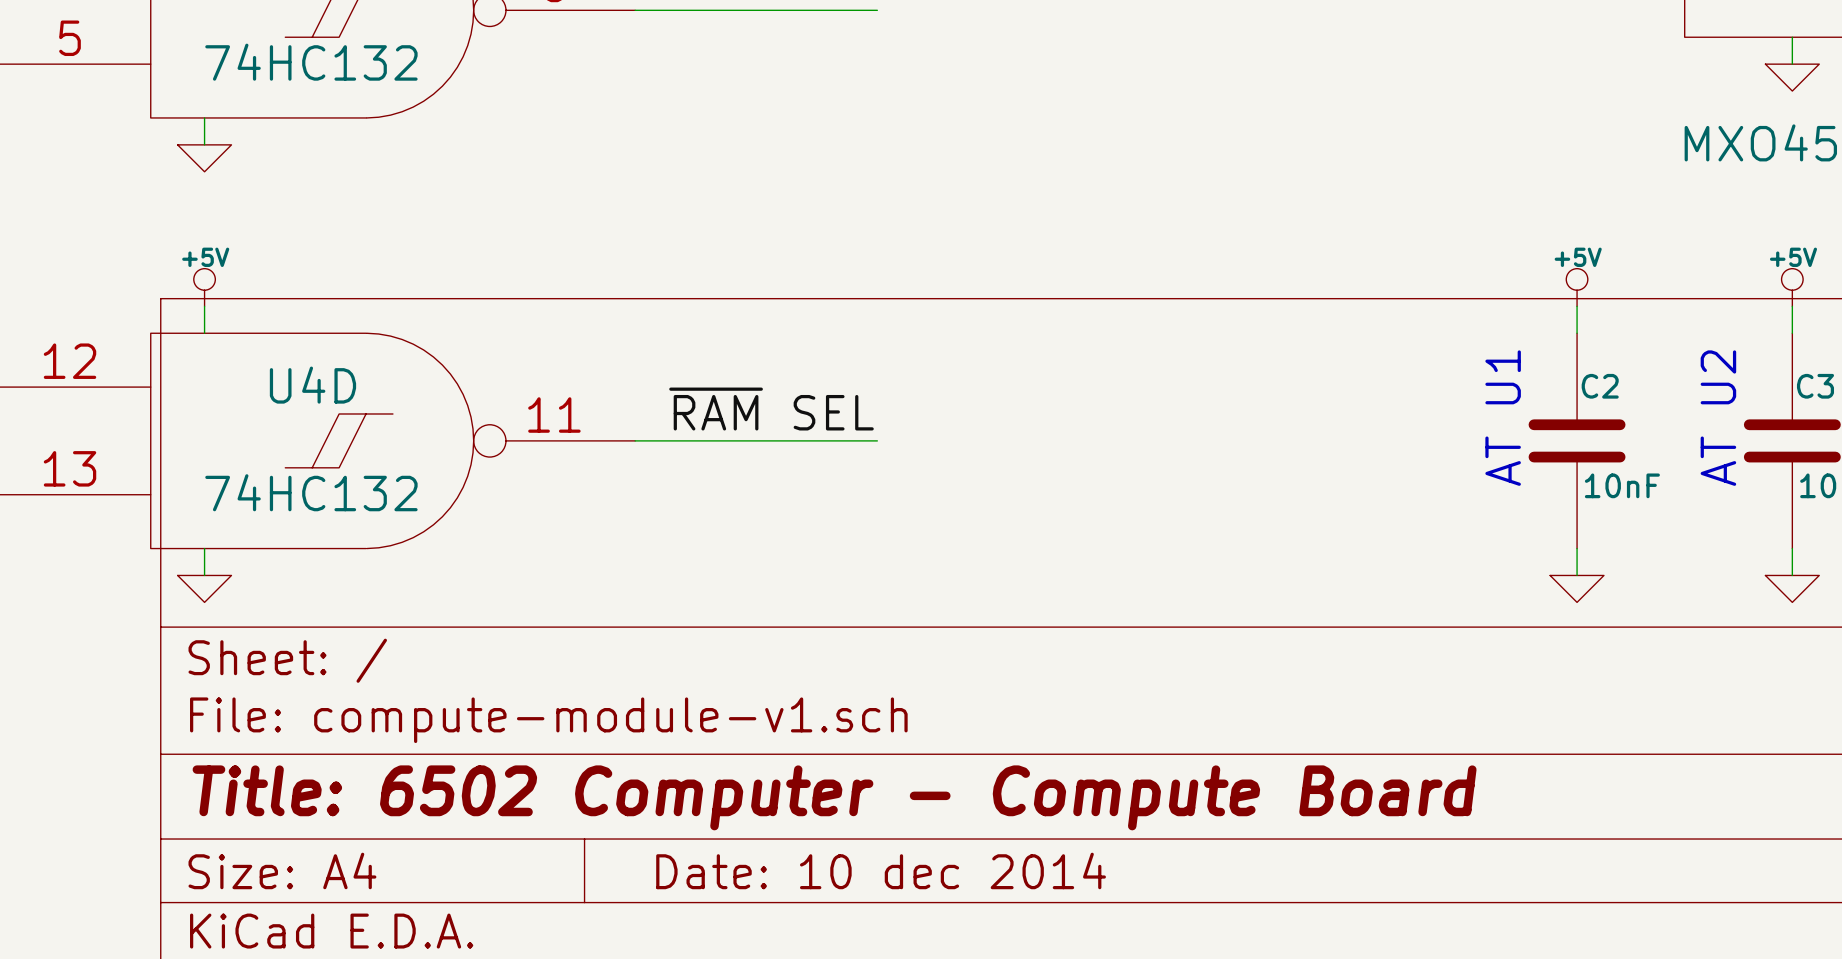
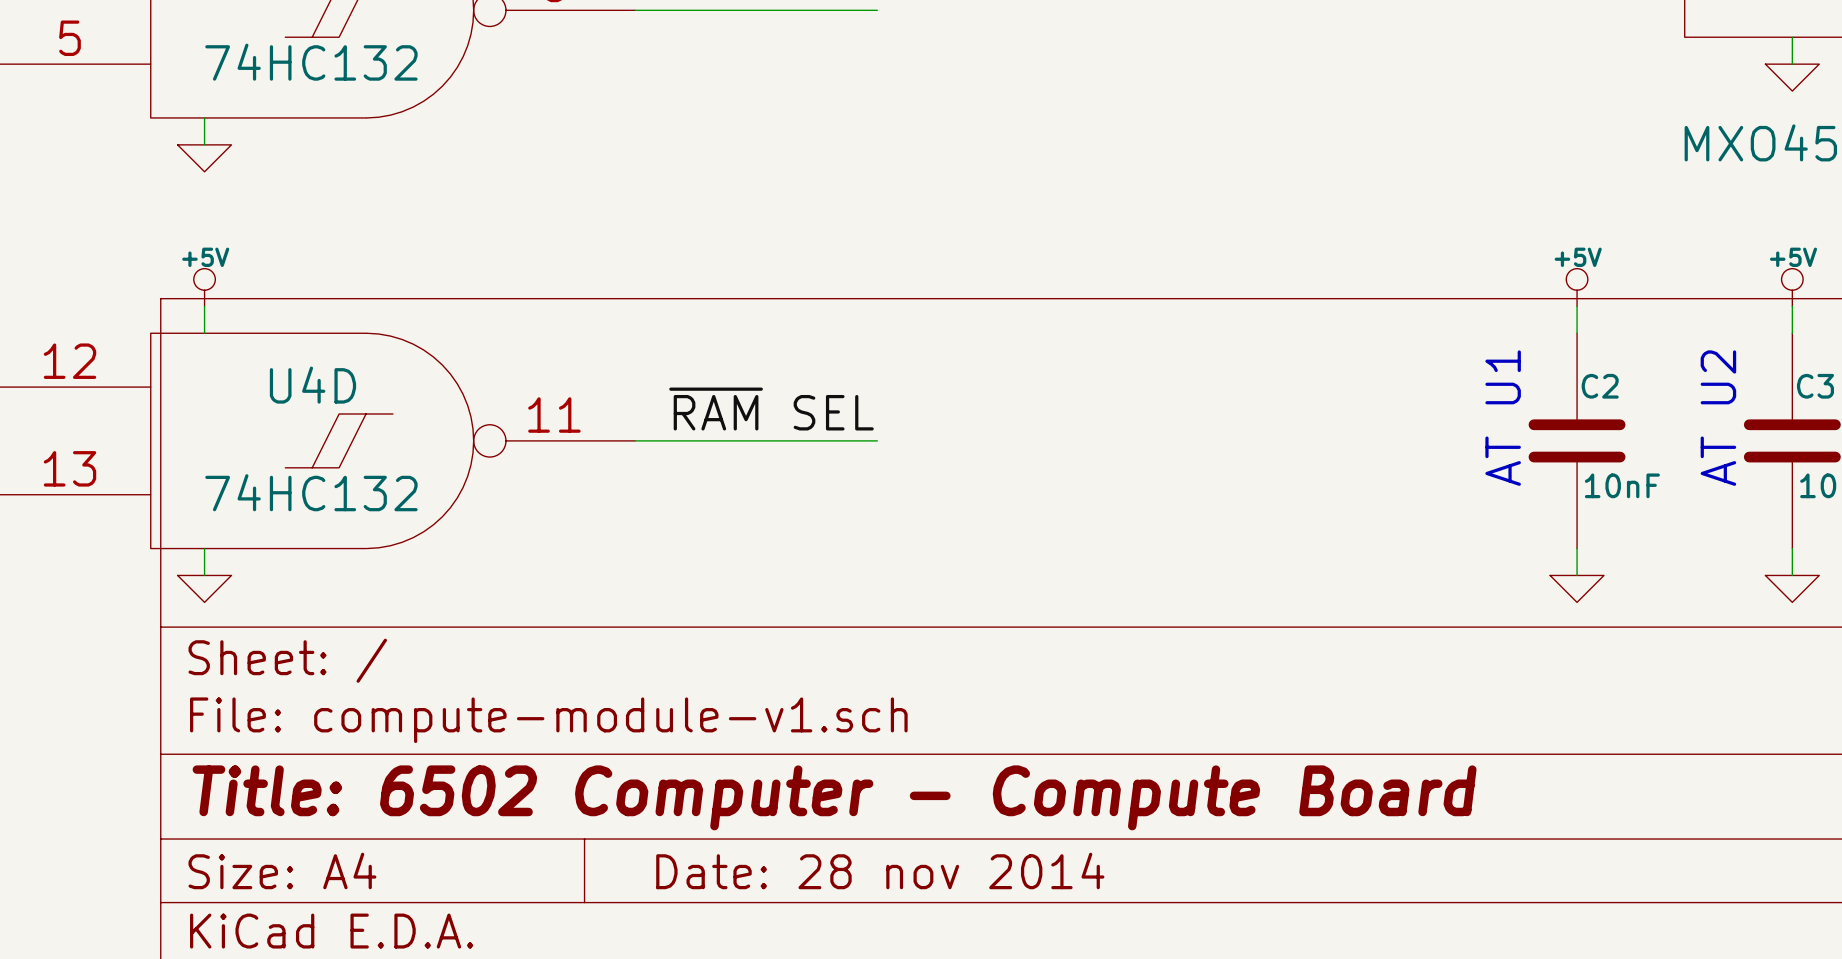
title block: Date: 10 dec 2014 (881, 870) -> Date: 28 nov 2014 (880, 870)

